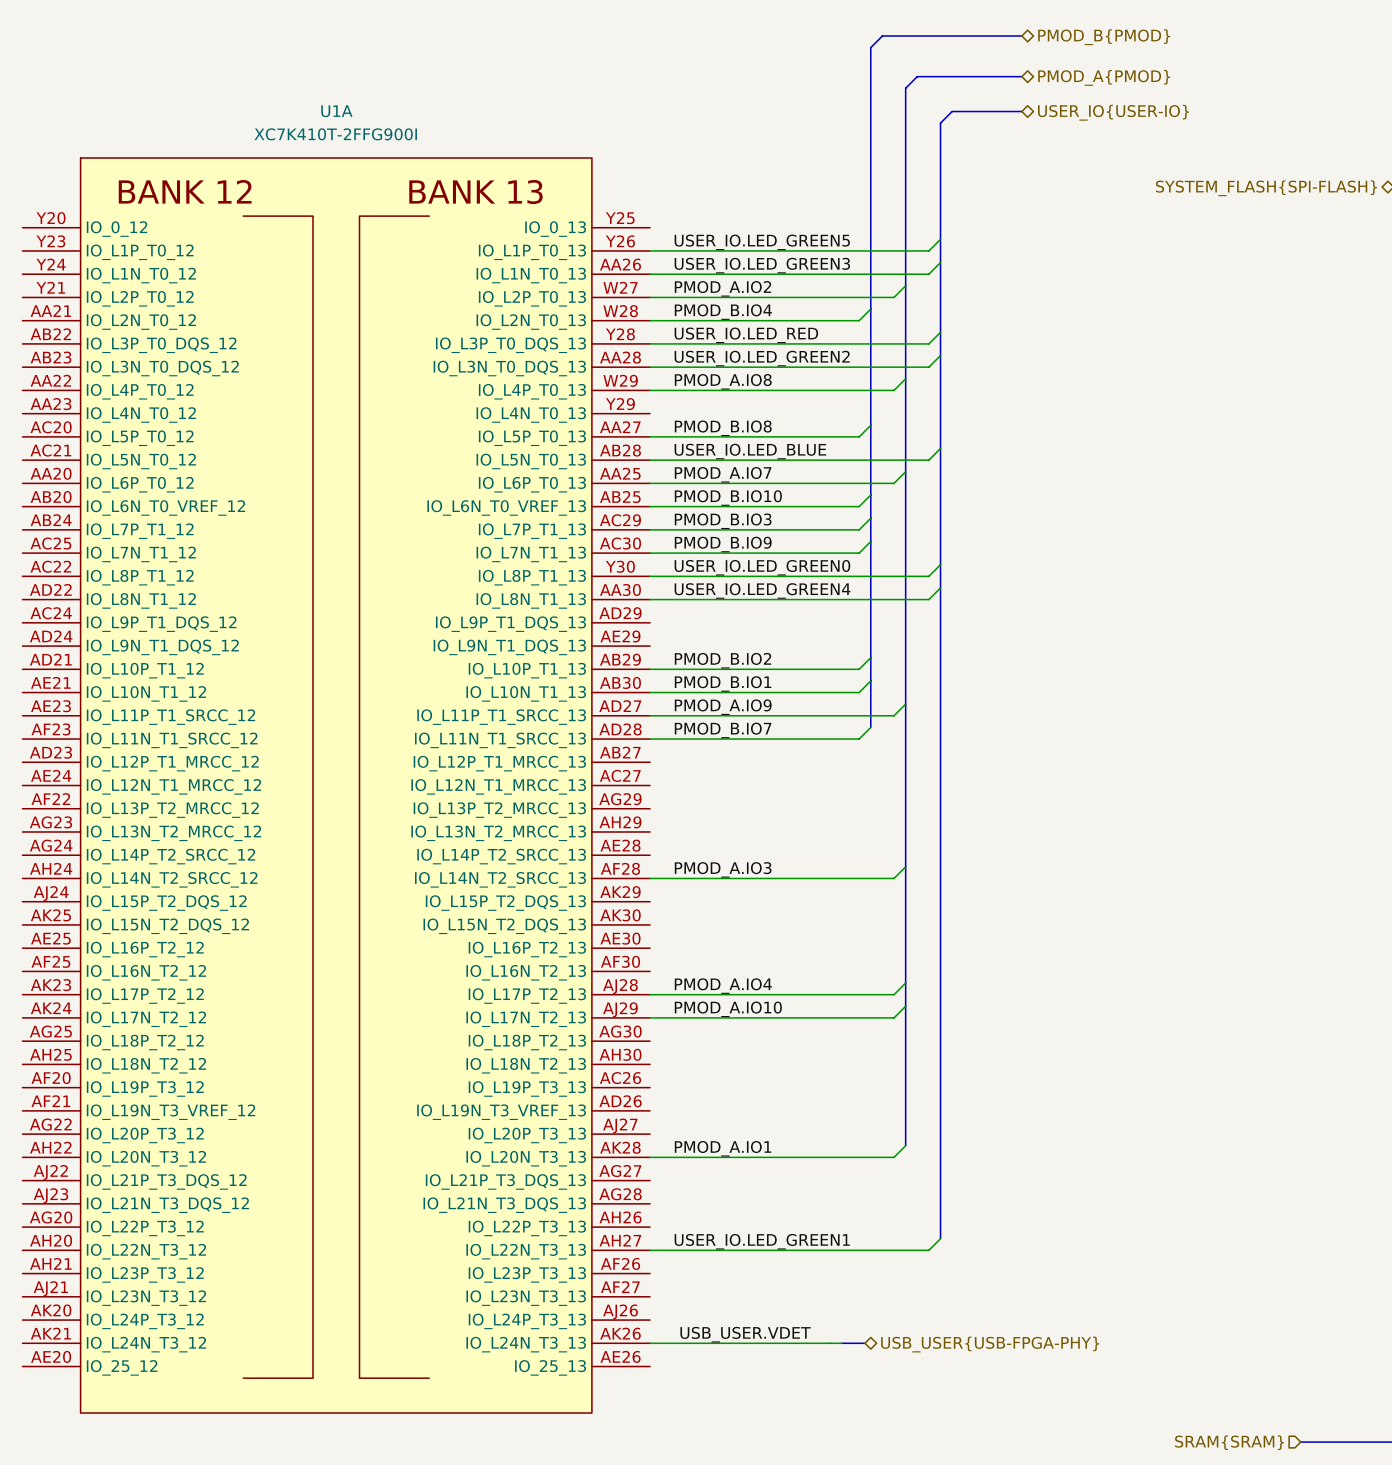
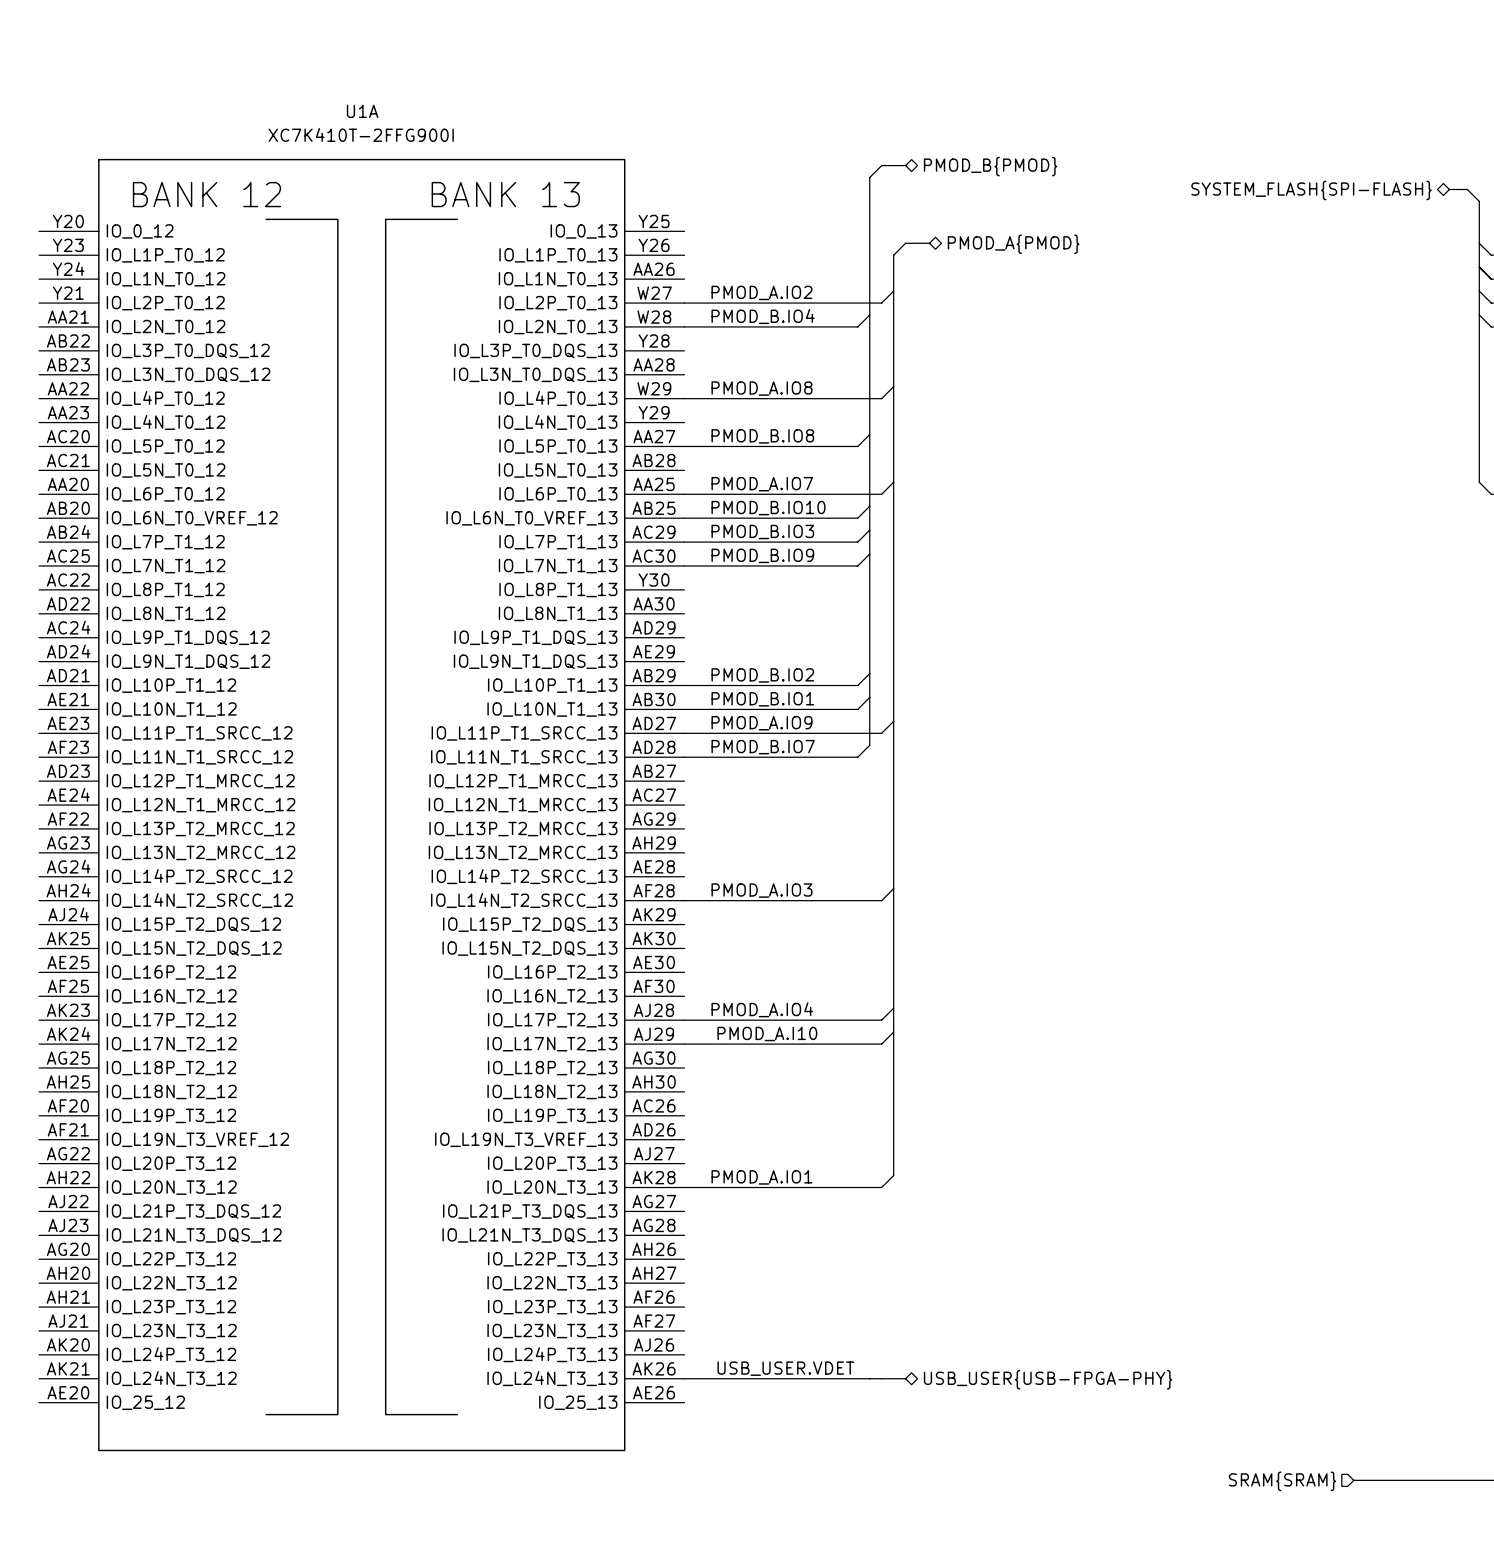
bus: (1021, 35) (882, 35) (870, 47) (870, 727) -> none
hierarchical label position: PMOD_B{PMOD} (1104, 37) -> PMOD_B{PMOD} (990, 166)
bus: (1021, 76) (917, 76) (905, 88) (905, 1145) -> none
hierarchical label position: PMOD_A{PMOD} (1104, 77) -> PMOD_A{PMOD} (1013, 244)
bus: (1021, 111) (952, 111) (940, 123) (940, 1238) -> none
hierarchical label: USER_IO{USER-IO} (1113, 112) -> none
bus: none -> (905, 165) (881, 165) (869, 177) (869, 745)
bus: none -> (929, 243) (905, 243) (893, 255) (893, 1175)
wire: (940, 239) (928, 250) (650, 250) -> none
label: USER_IO.LED_GREEN5 (762, 242) -> none
wire: (940, 262) (928, 274) (650, 274) -> none
label: USER_IO.LED_GREEN3 (762, 265) -> none
wire: (905, 285) (894, 297) (841, 297) -> (893, 291) (881, 303)
wire: (870, 309) (859, 320) (818, 320) -> (869, 314) (857, 326)
wire: (940, 332) (928, 343) (650, 343) -> none
label: USER_IO.LED_RED (746, 335) -> none
wire: (940, 355) (928, 367) (650, 367) -> none
label: USER_IO.LED_GREEN2 (762, 358) -> none
wire: (905, 378) (894, 390) (841, 390) -> (893, 386) (881, 398)
wire: (870, 425) (859, 436) (818, 436) -> (869, 434) (857, 446)
wire: (940, 448) (928, 460) (650, 460) -> none
label: USER_IO.LED_BLUE (750, 451) -> none
wire: (905, 471) (894, 483) (841, 483) -> (893, 482) (881, 494)
wire: (870, 494) (859, 506) (818, 506) -> (869, 506) (857, 518)
wire: (870, 518) (859, 529) (818, 529) -> (869, 530) (857, 542)
wire: (870, 541) (859, 553) (818, 553) -> (869, 554) (857, 565)
wire: (940, 564) (928, 576) (650, 576) -> none
label: USER_IO.LED_GREEN0 (762, 567) -> none
wire: (940, 587) (928, 599) (650, 599) -> none
label: USER_IO.LED_GREEN4 (762, 590) -> none
wire: (870, 657) (859, 669) (818, 669) -> (869, 673) (857, 685)
wire: (870, 680) (859, 692) (818, 692) -> (869, 697) (857, 709)
wire: (905, 704) (894, 715) (841, 715) -> (893, 721) (881, 733)
wire: (870, 727) (859, 739) (818, 739) -> (869, 745) (857, 757)
wire: (905, 866) (894, 878) (841, 878) -> (893, 888) (881, 900)
wire: (905, 983) (894, 994) (841, 994) -> (893, 1008) (881, 1020)
wire: (905, 1006) (894, 1017) (841, 1017) -> (893, 1032) (881, 1044)
label: PMOD_A.IO10 (728, 1009) -> PMOD_A.I10 (767, 1033)
wire: (905, 1145) (894, 1157) (841, 1157) -> (893, 1175) (881, 1187)
wire: (940, 1238) (928, 1250) (650, 1250) -> none
label: USER_IO.LED_GREEN1 (762, 1241) -> none

